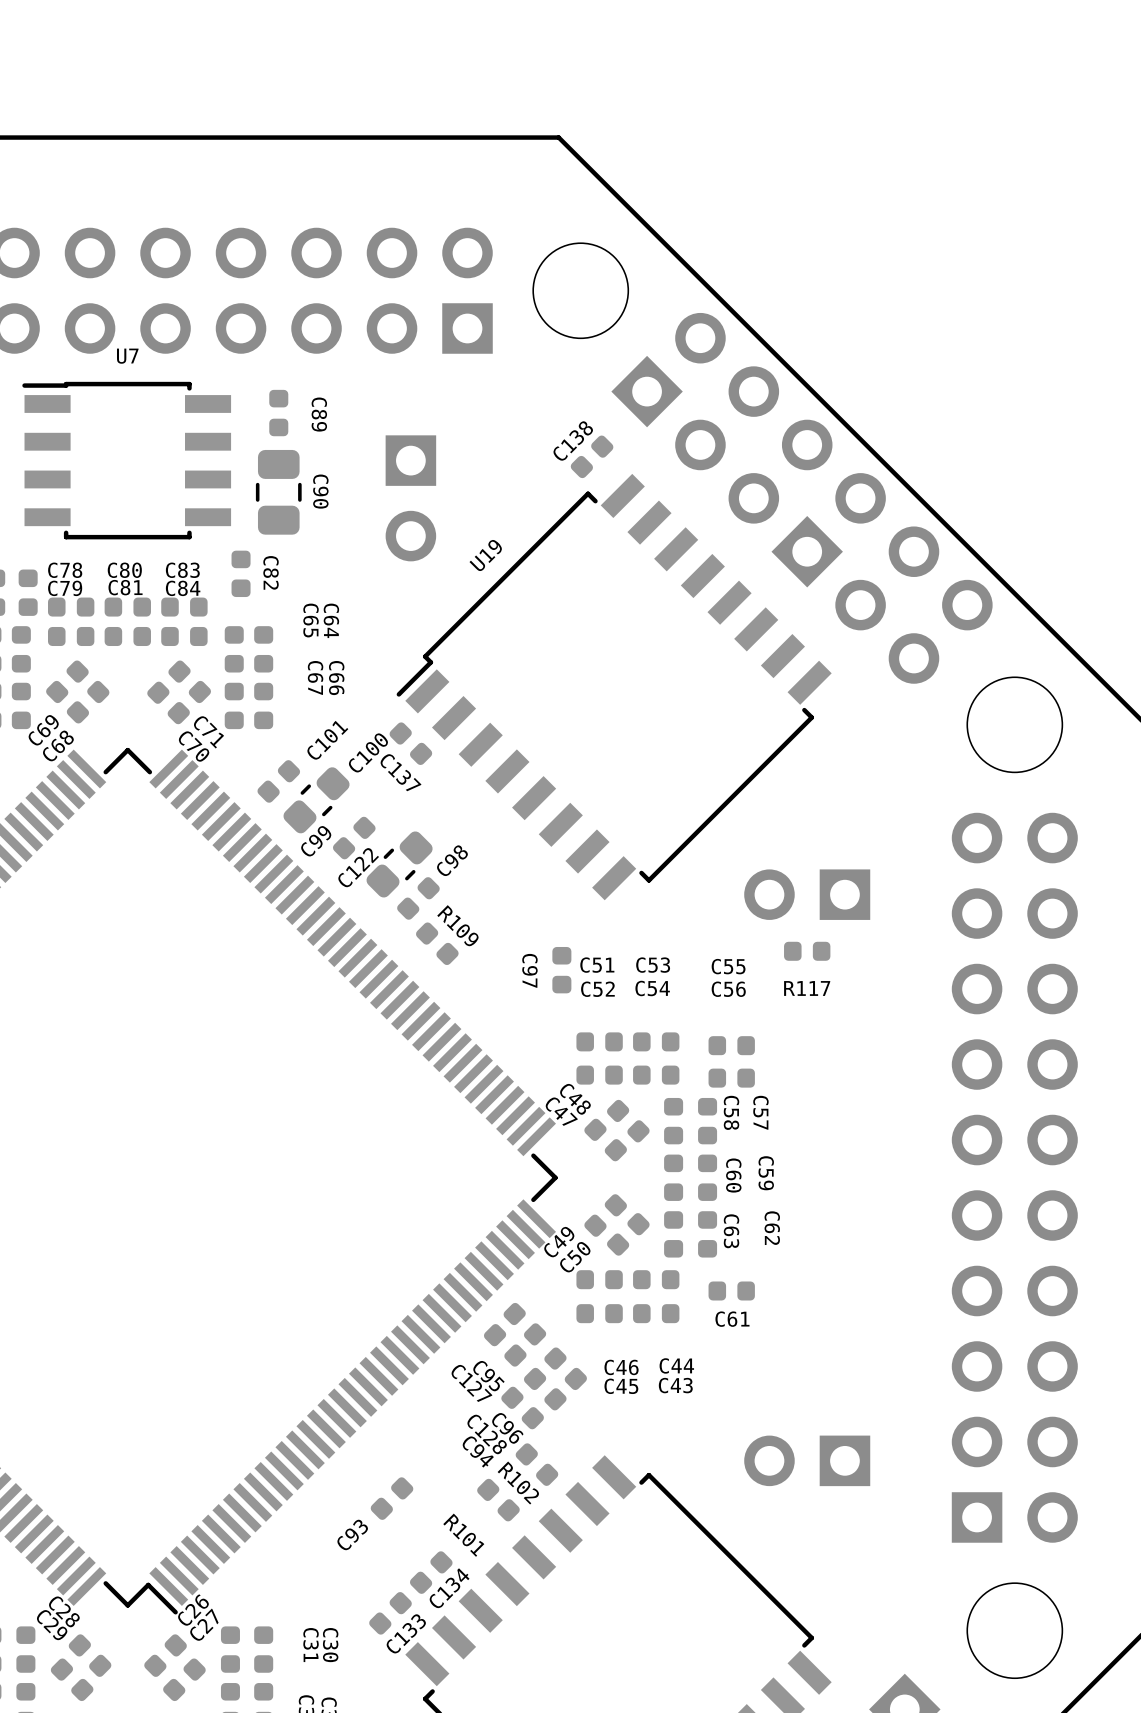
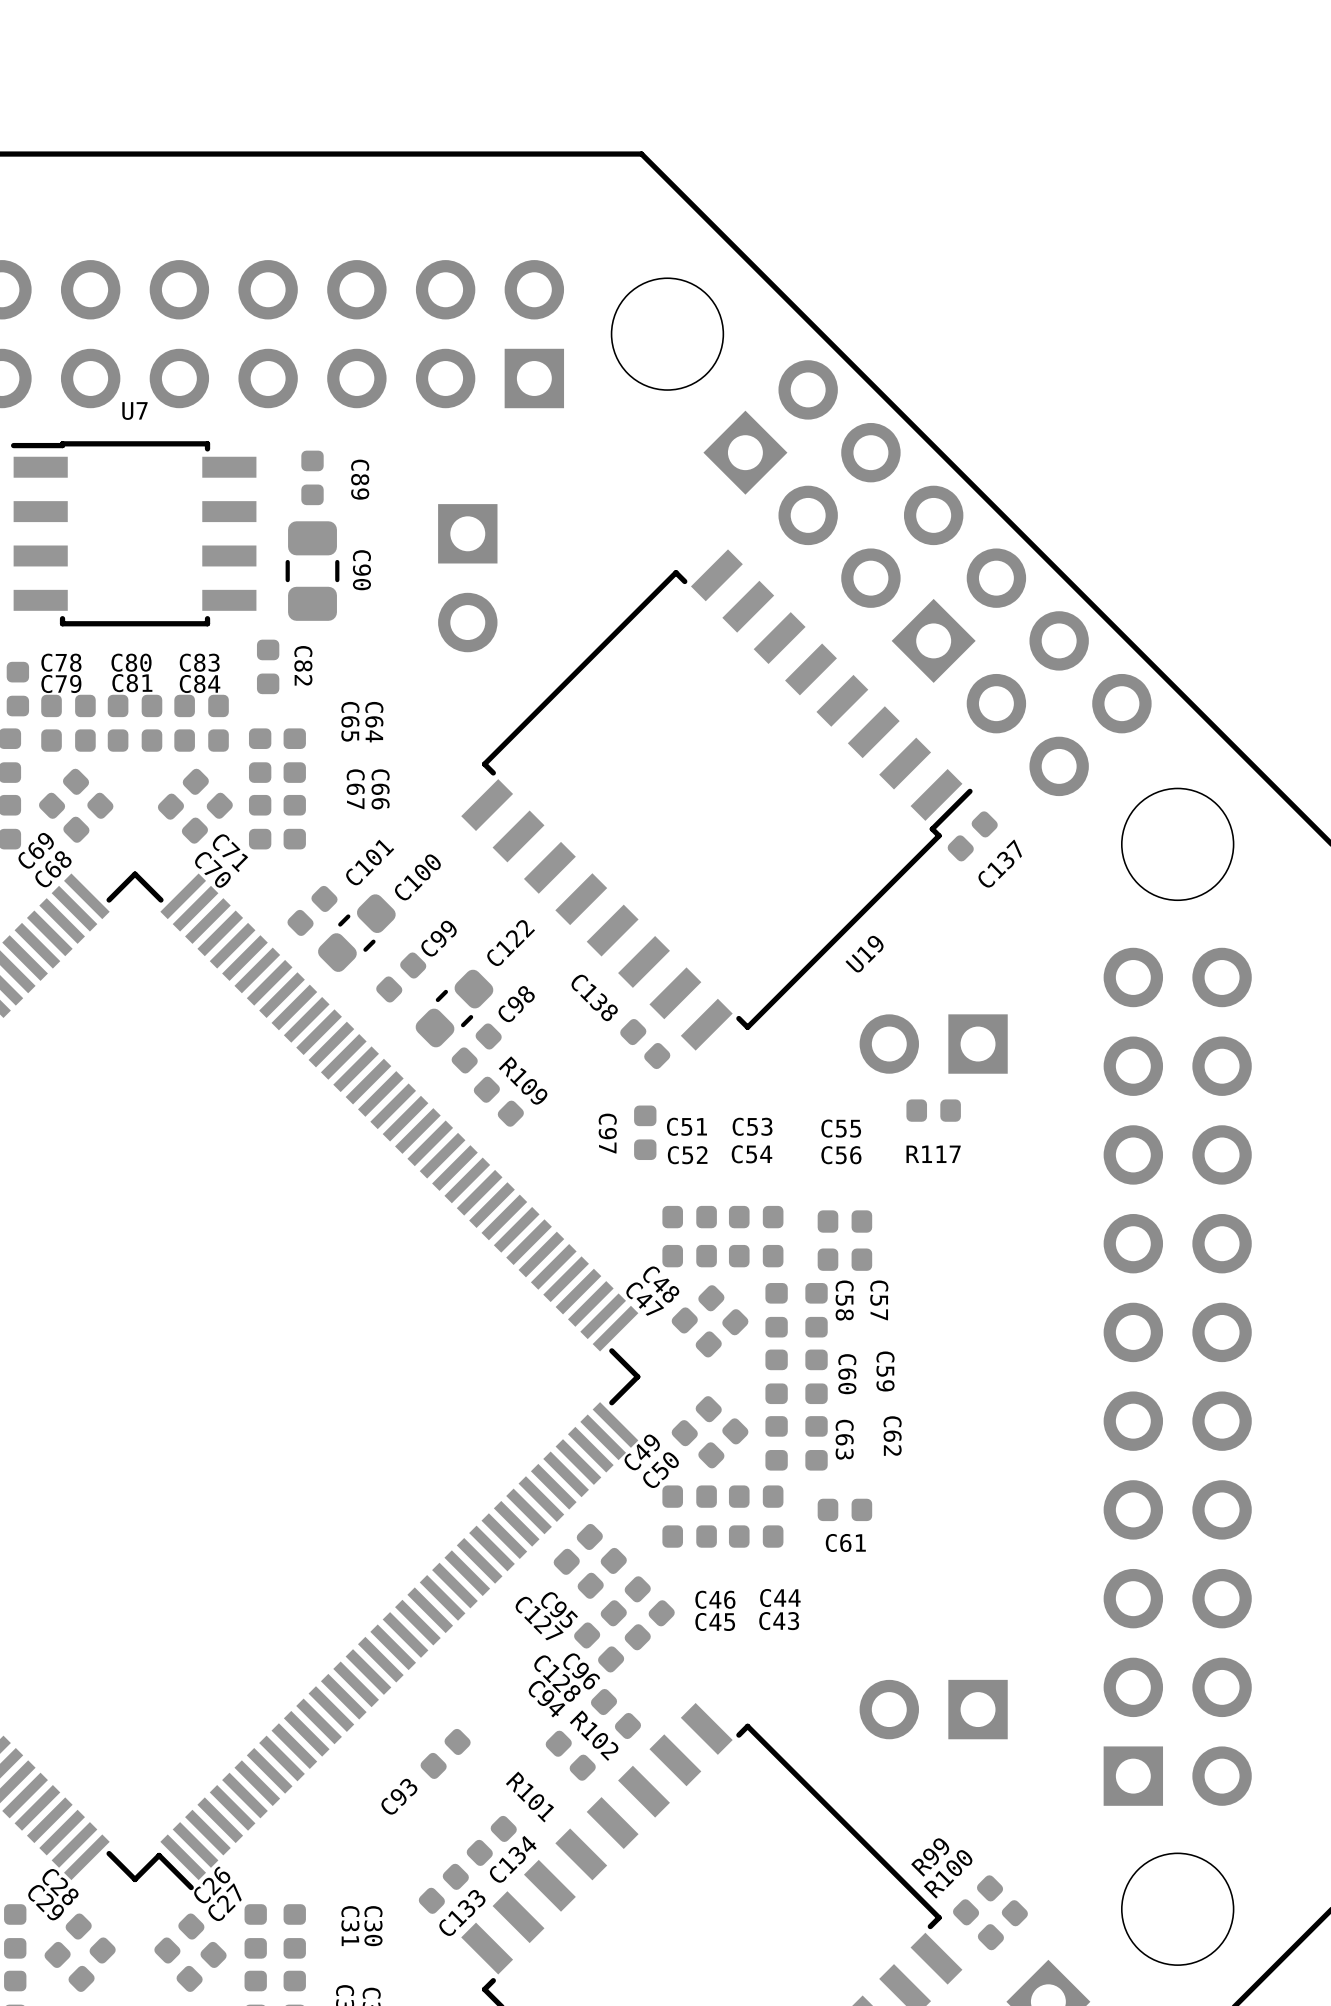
C138 rotation: 0° (592, 456) -> 90° clockwise (645, 1044)
C138 position: (592, 456) -> (645, 1044)
U19 rotation: 0° (614, 687) -> 180° (716, 800)
C137 rotation: 0° (410, 743) -> 90° clockwise (972, 836)
C137 position: (410, 743) -> (972, 836)
C99 name position: C99 (316, 841) -> C99 (439, 938)
C122 name position: C122 (358, 867) -> C122 (510, 943)
R99: none -> (978, 1900)
R100: none -> (1002, 1925)

